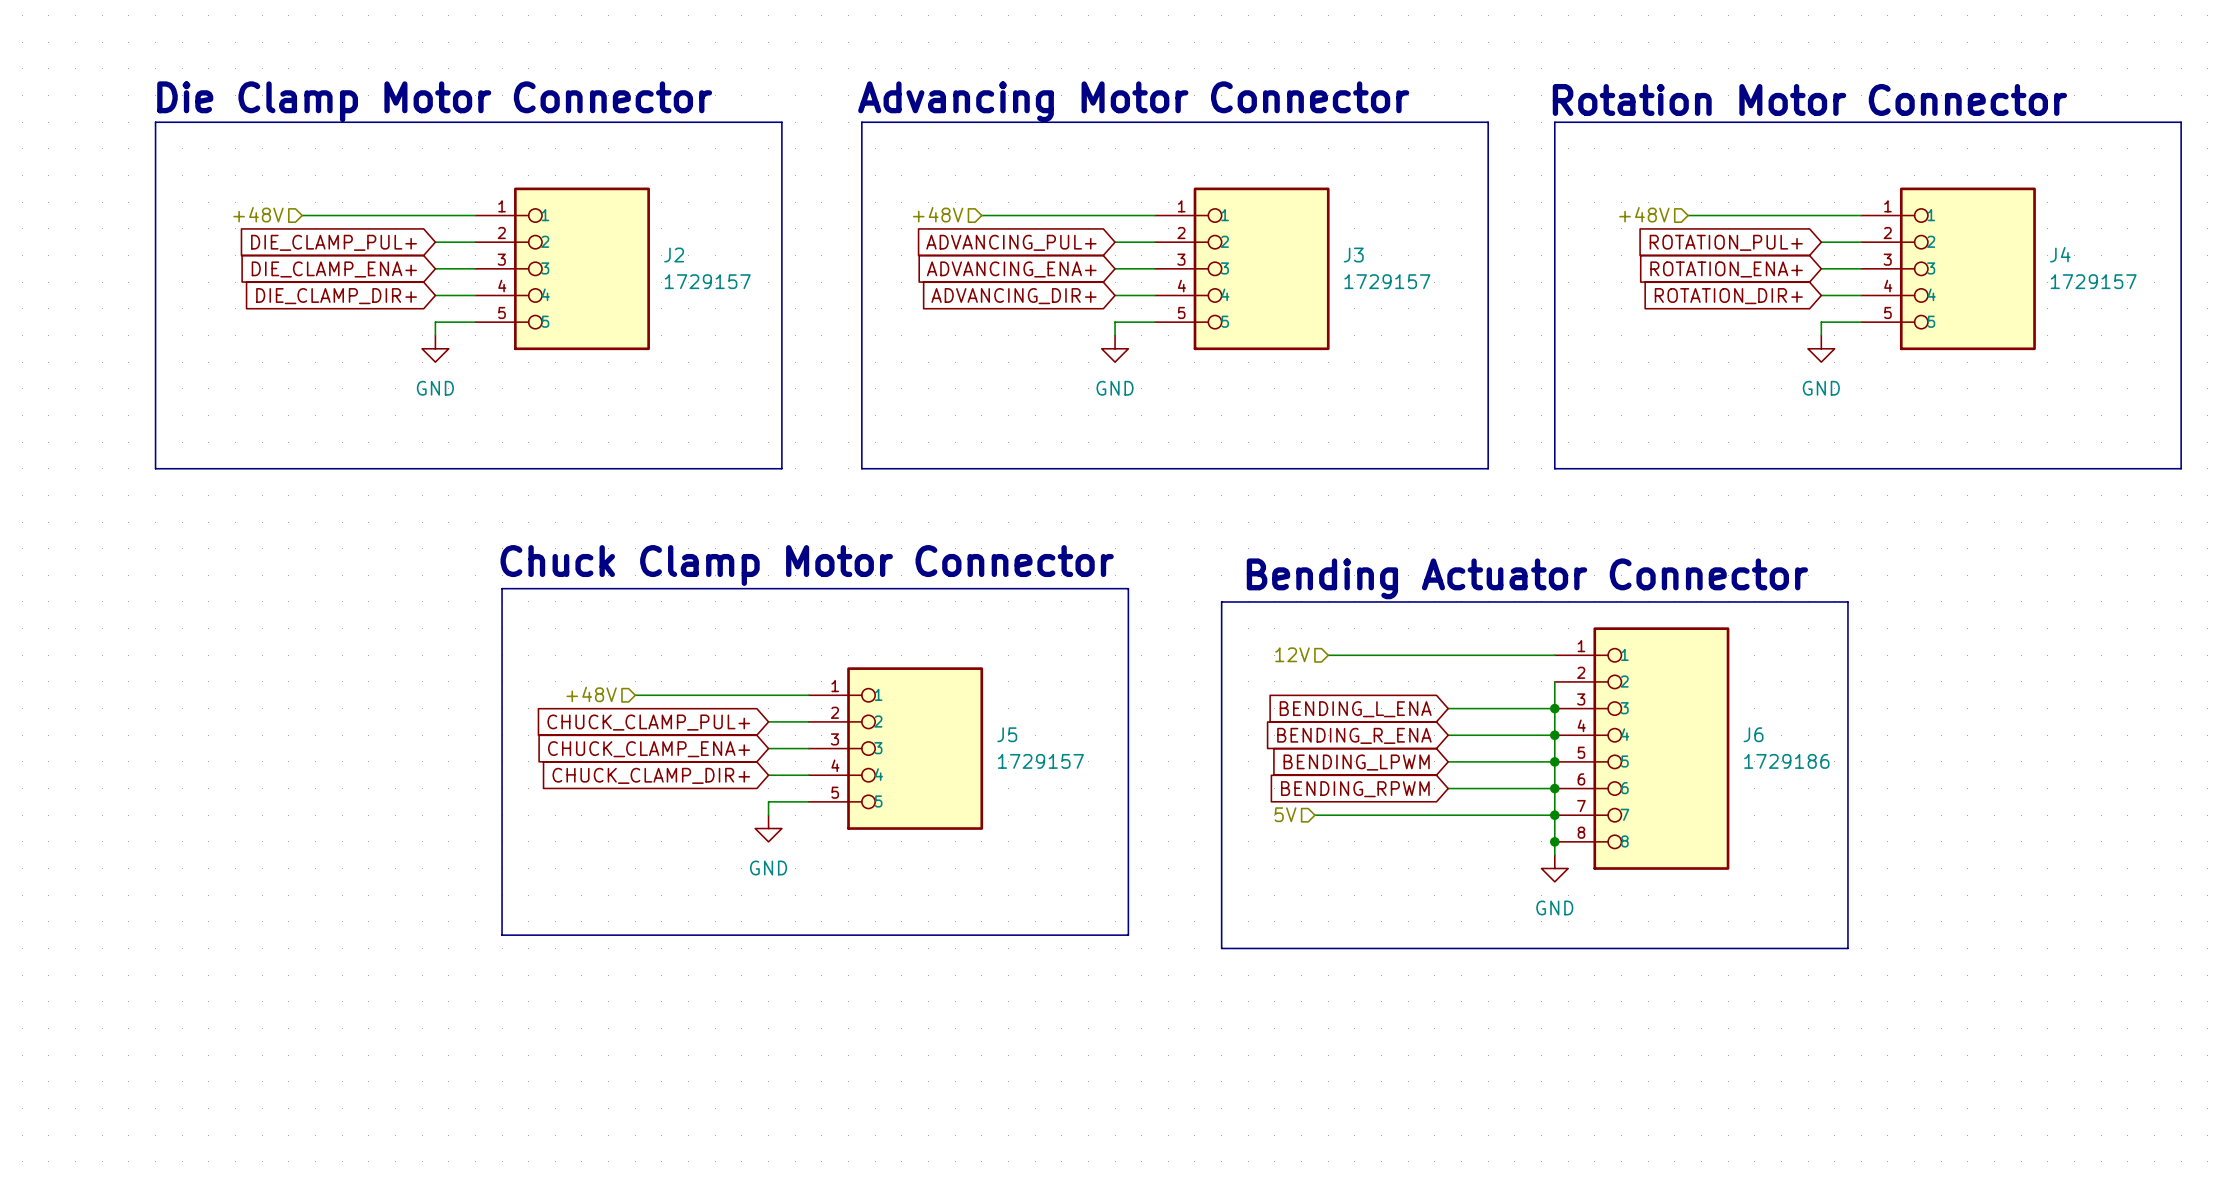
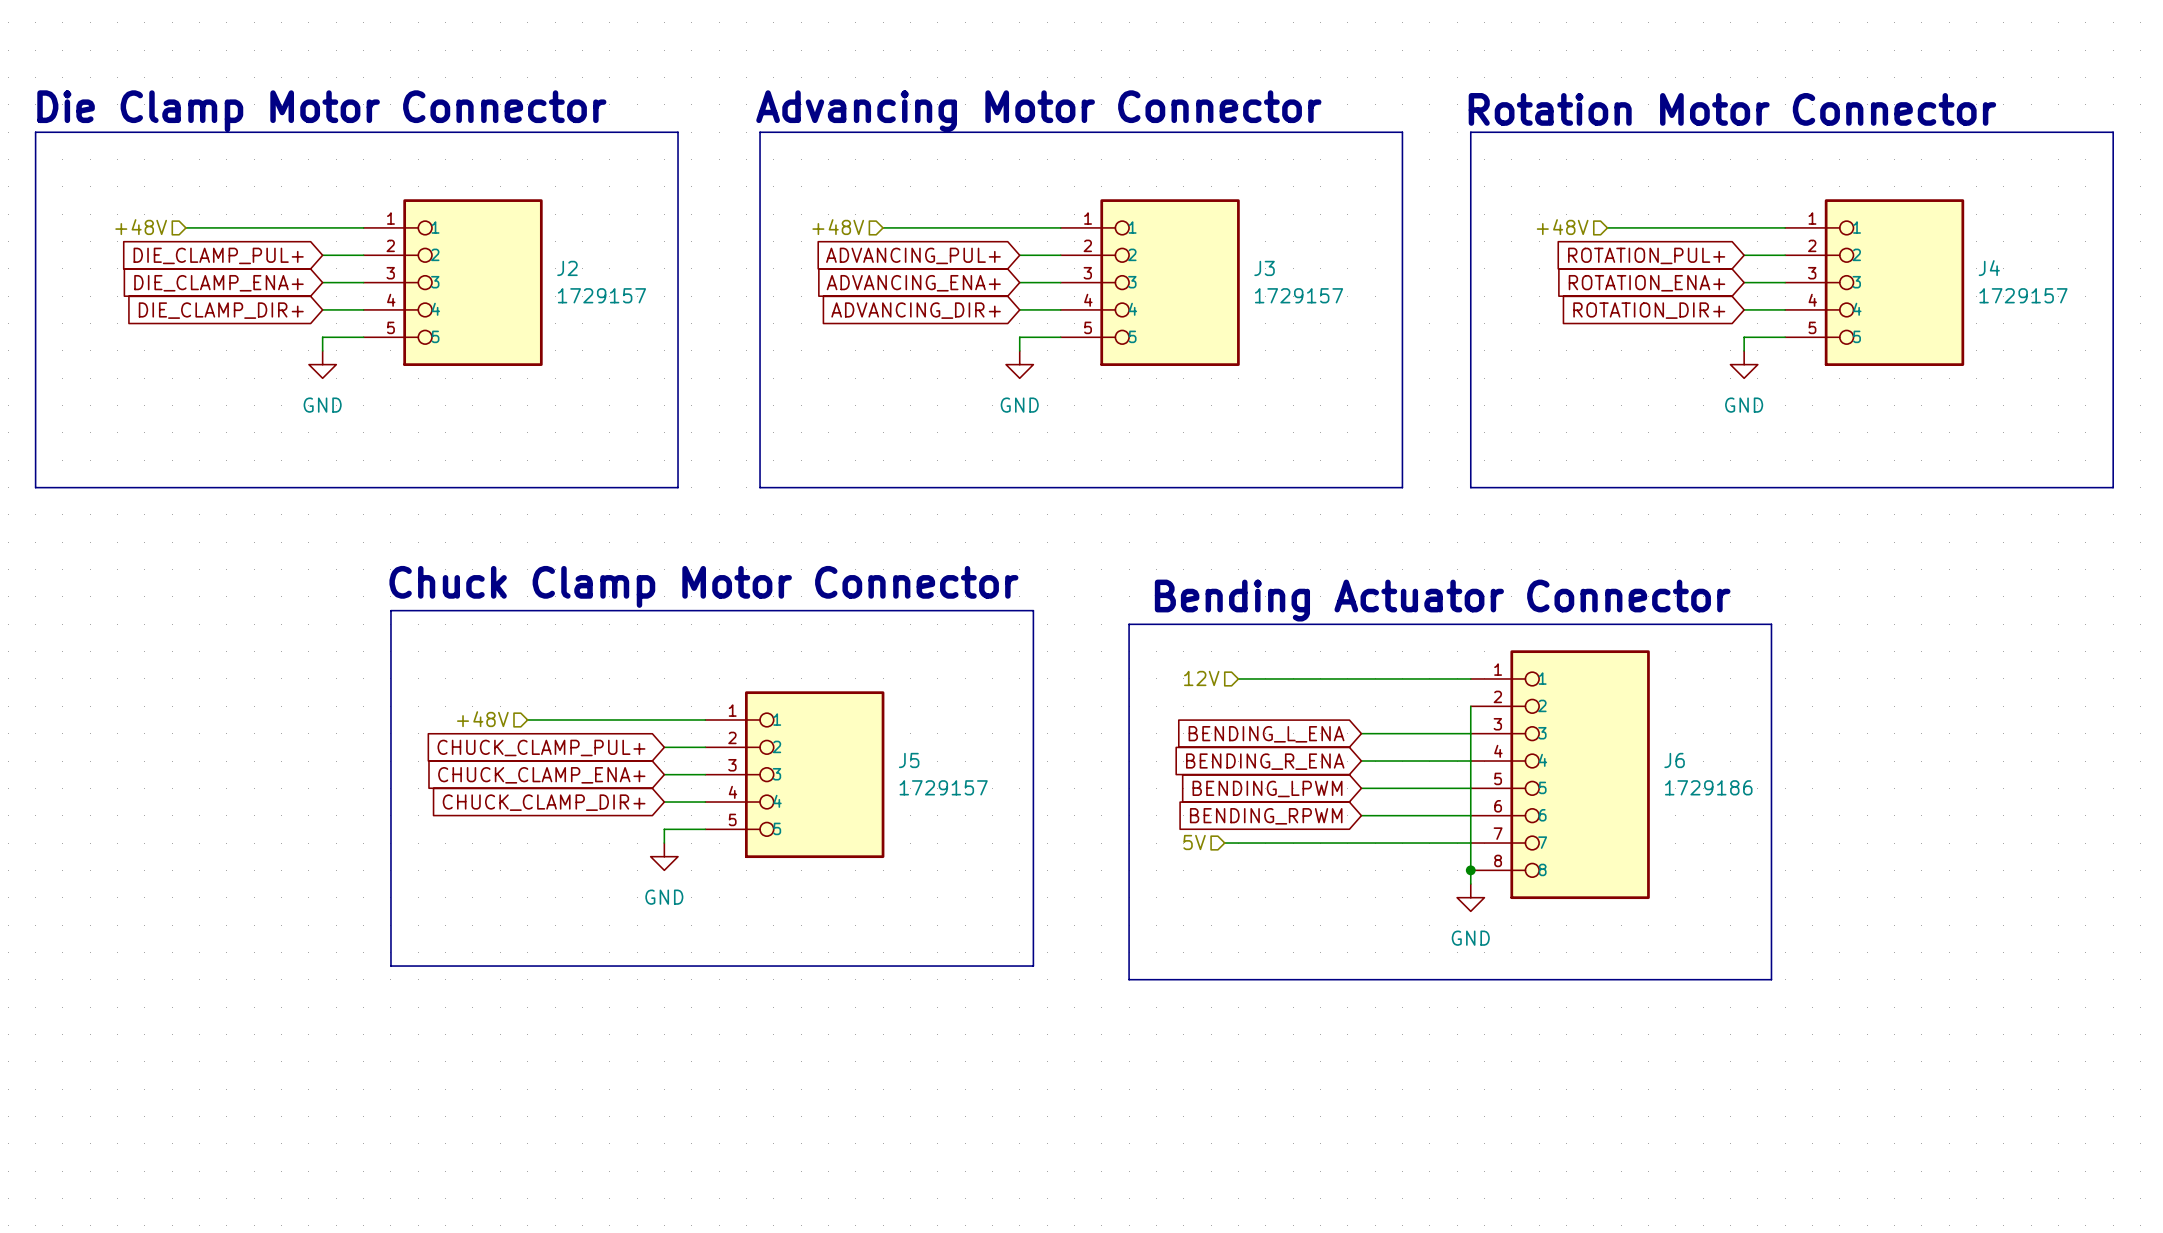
junction: (1554, 708) -> none
junction: (1554, 735) -> none
junction: (1554, 761) -> none
junction: (1554, 788) -> none
junction: (1554, 815) -> none

